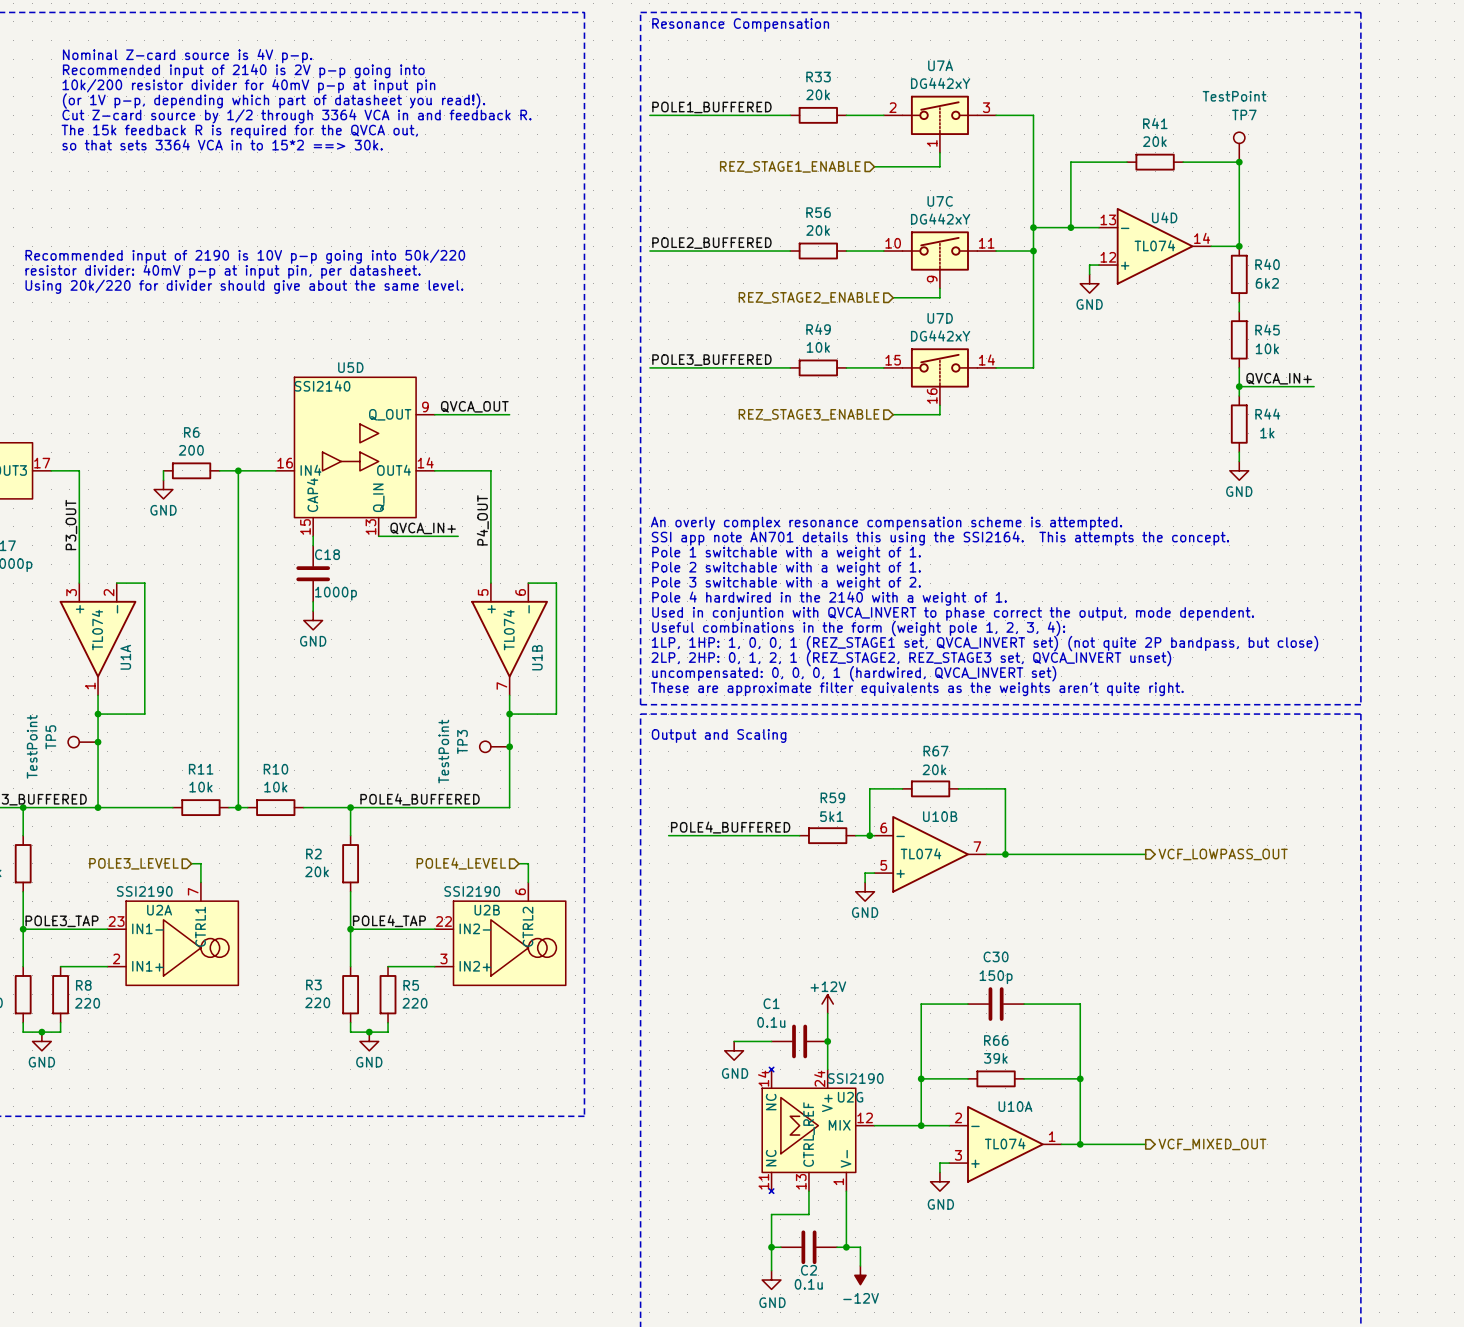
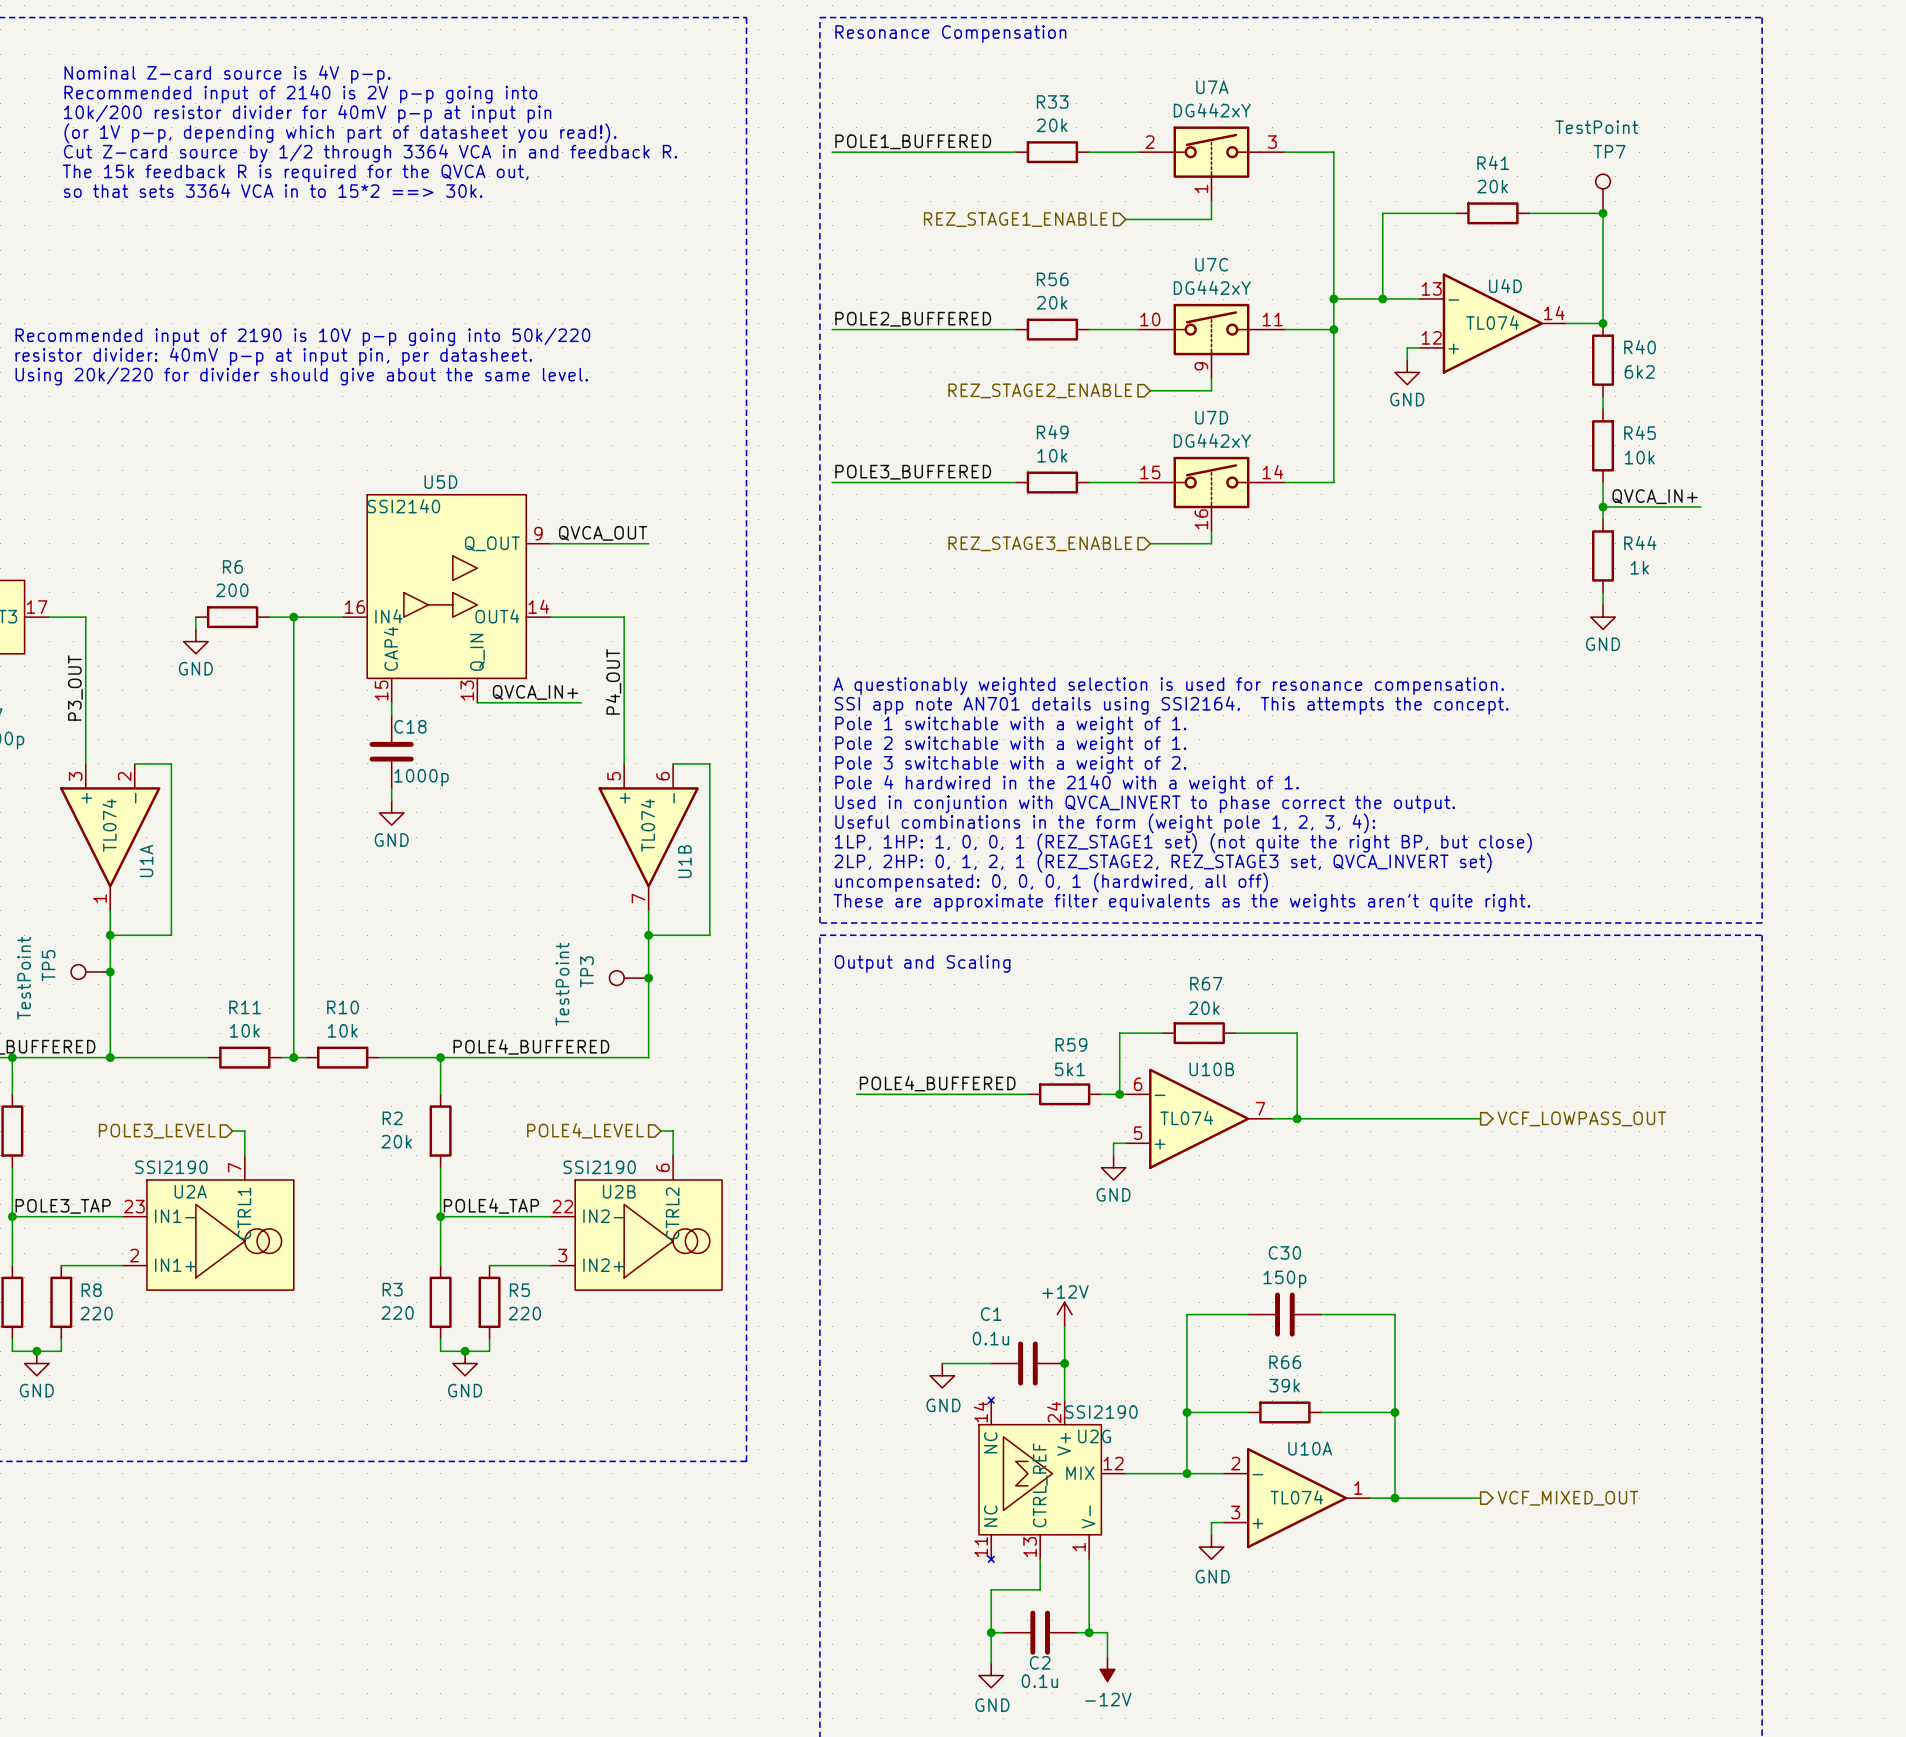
text: An overly complex resonance compensation scheme is attempted. (886, 523) -> A questionably weighted selection is used for resonance compensation. (1168, 686)
text: SSI app note AN701 details this using the SSI2164. This attempts the concept. (940, 538) -> SSI app note AN701 details using SSI2164. This attempts the concept. (1171, 705)
text: Used in conjuntion with QVCA_INVERT to phase correct the output, mode dependent. (953, 613) -> Used in conjuntion with QVCA_INVERT to phase correct the output. (1145, 804)
text: 1LP, 1HP: 1, 0, 0, 1 (REZ_STAGE1 set, QVCA_INVERT set) (not quite 2P bandpass, but close) (985, 643) -> 1LP, 1HP: 1, 0, 0, 1 (REZ_STAGE1 set) (not quite the right BP, but close) (1183, 843)
text: 2LP, 2HP: 0, 1, 2, 1 (REZ_STAGE2, REZ_STAGE3 set, QVCA_INVERT unset) (911, 658) -> 2LP, 2HP: 0, 1, 2, 1 (REZ_STAGE2, REZ_STAGE3 set, QVCA_INVERT set) (1162, 862)
text: uncompensated: 0, 0, 0, 1 (hardwired, QVCA_INVERT set) (854, 673) -> uncompensated: 0, 0, 0, 1 (hardwired, all off) (1051, 882)

